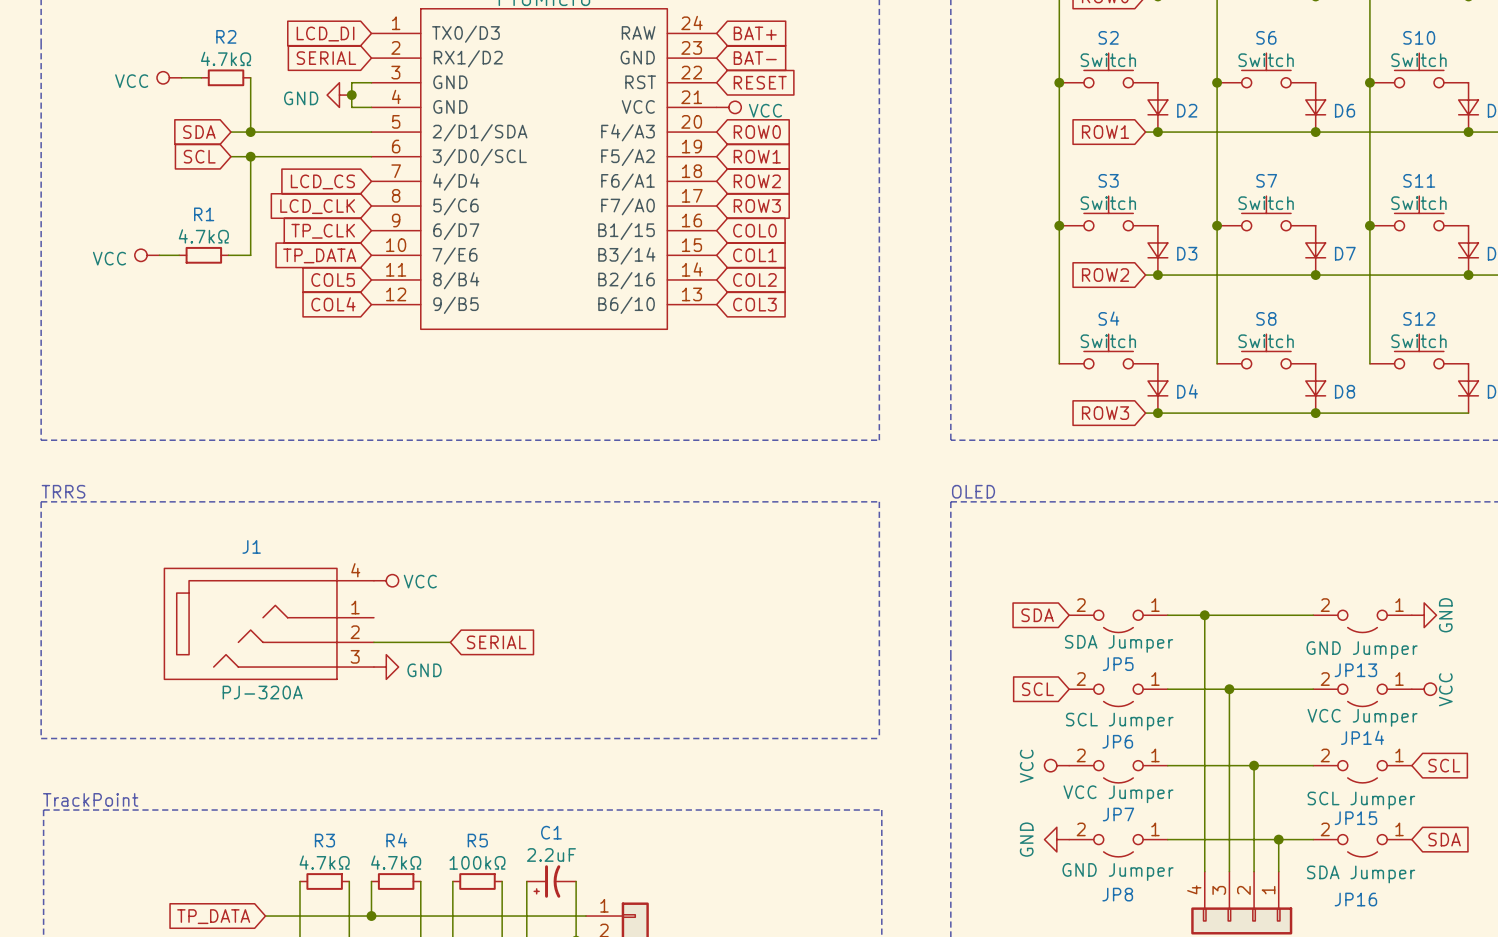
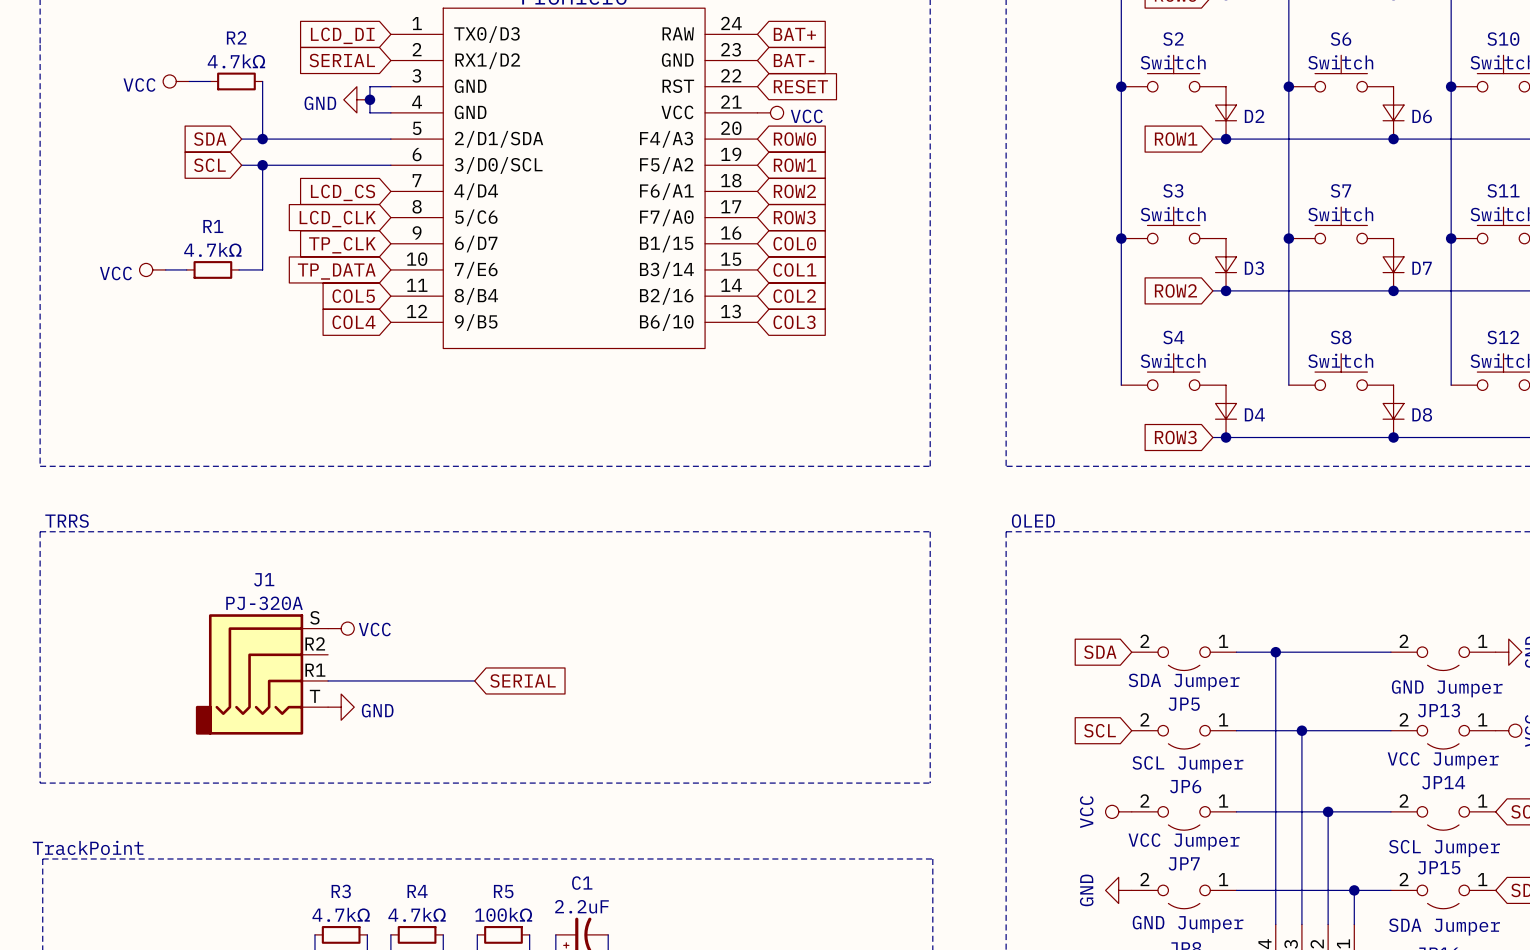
J1 symbol: [164, 568, 374, 680] -> [195, 614, 329, 735]
power symbol position: VCC (386, 580) -> VCC (341, 628)
power symbol position: GND (386, 667) -> GND (341, 707)
J1 value position: PJ-320A (262, 692) -> PJ-320A (264, 603)

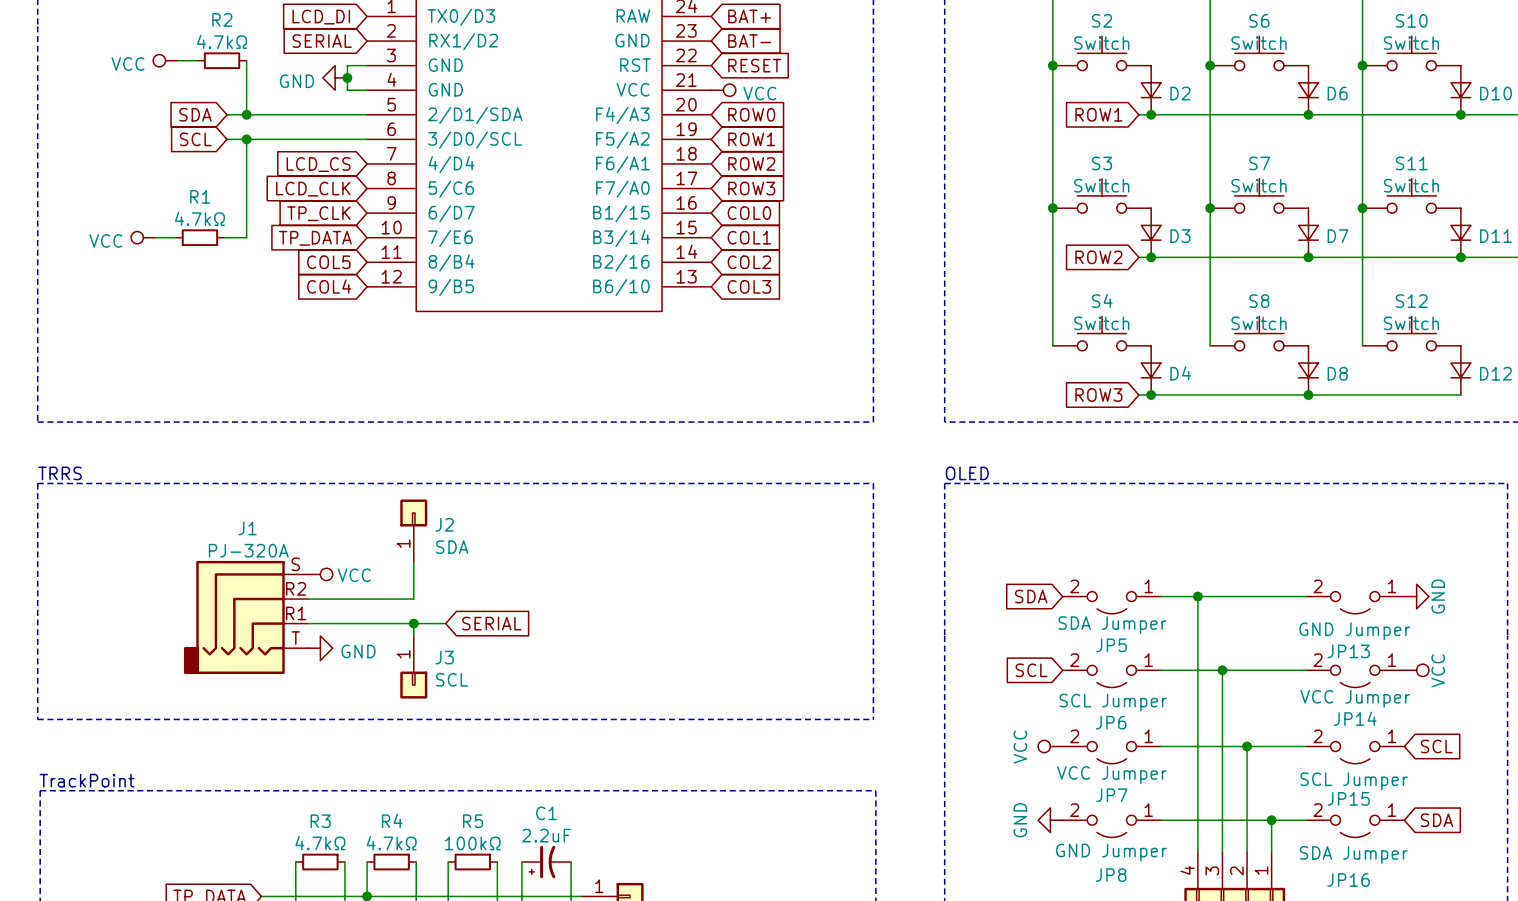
J2: none -> SDA (413, 530)
wire: none -> (413, 562) (413, 599) (308, 599)
wire: none -> (413, 623) (413, 635)
junction: none -> (413, 623)
J3: none -> SCL (413, 667)

